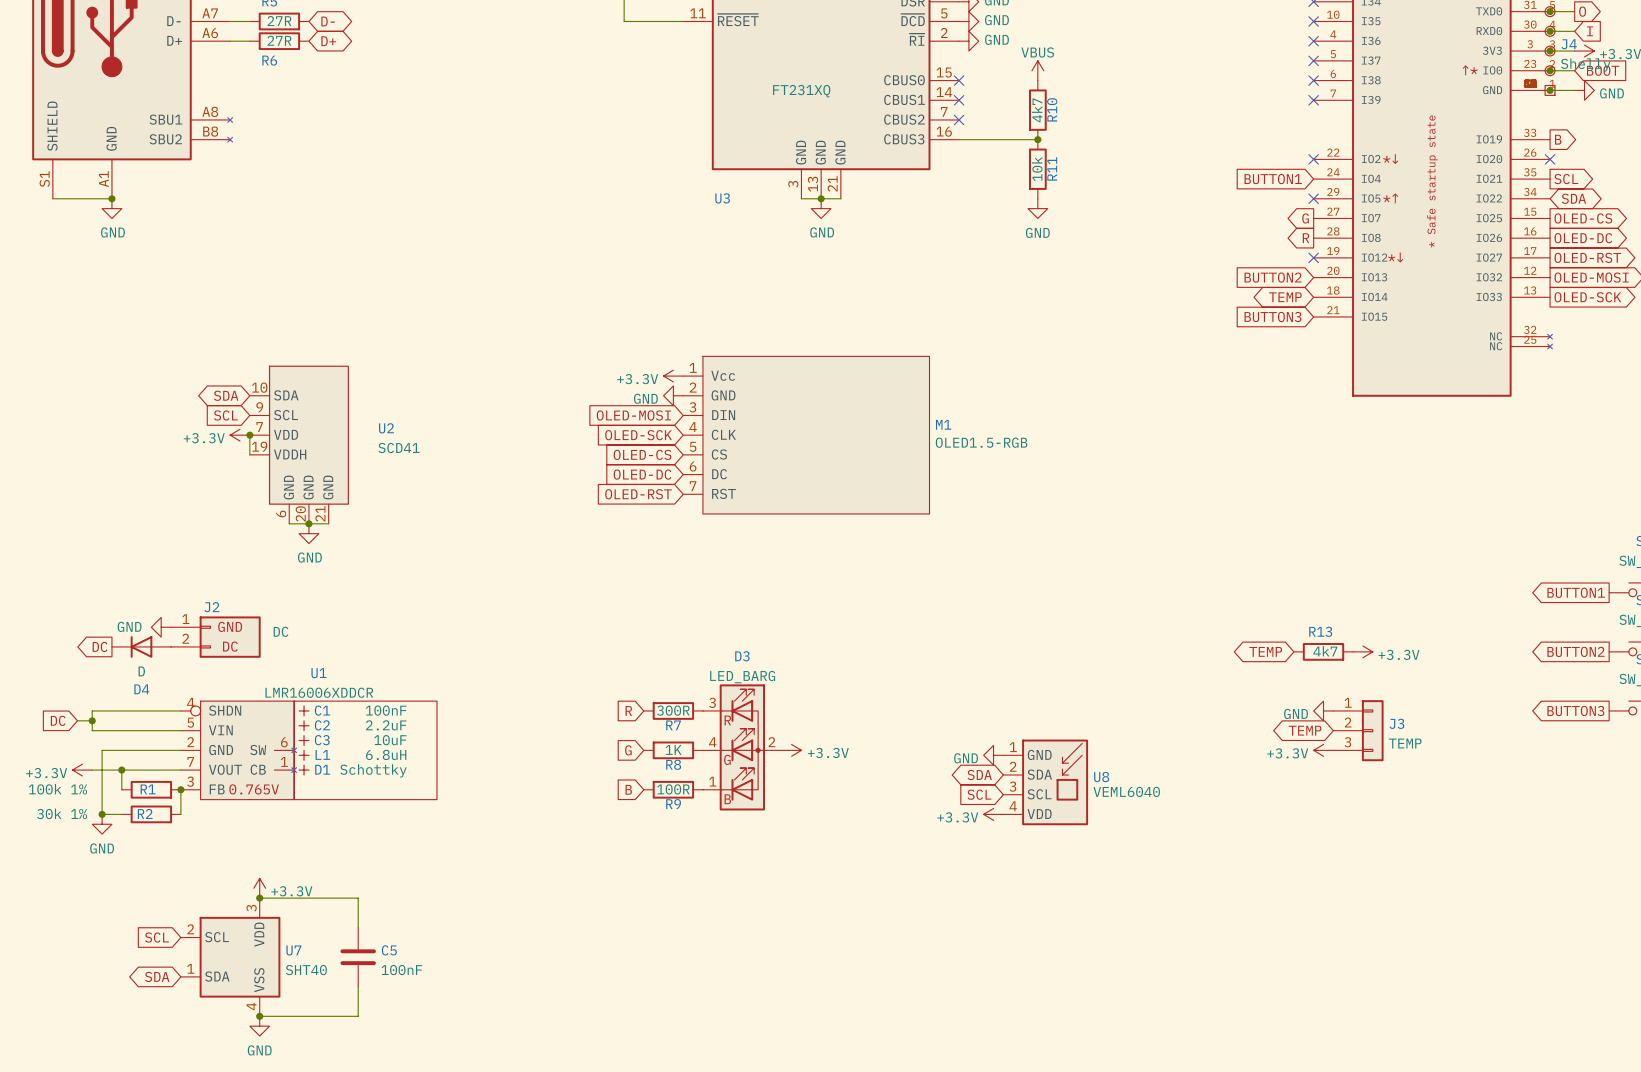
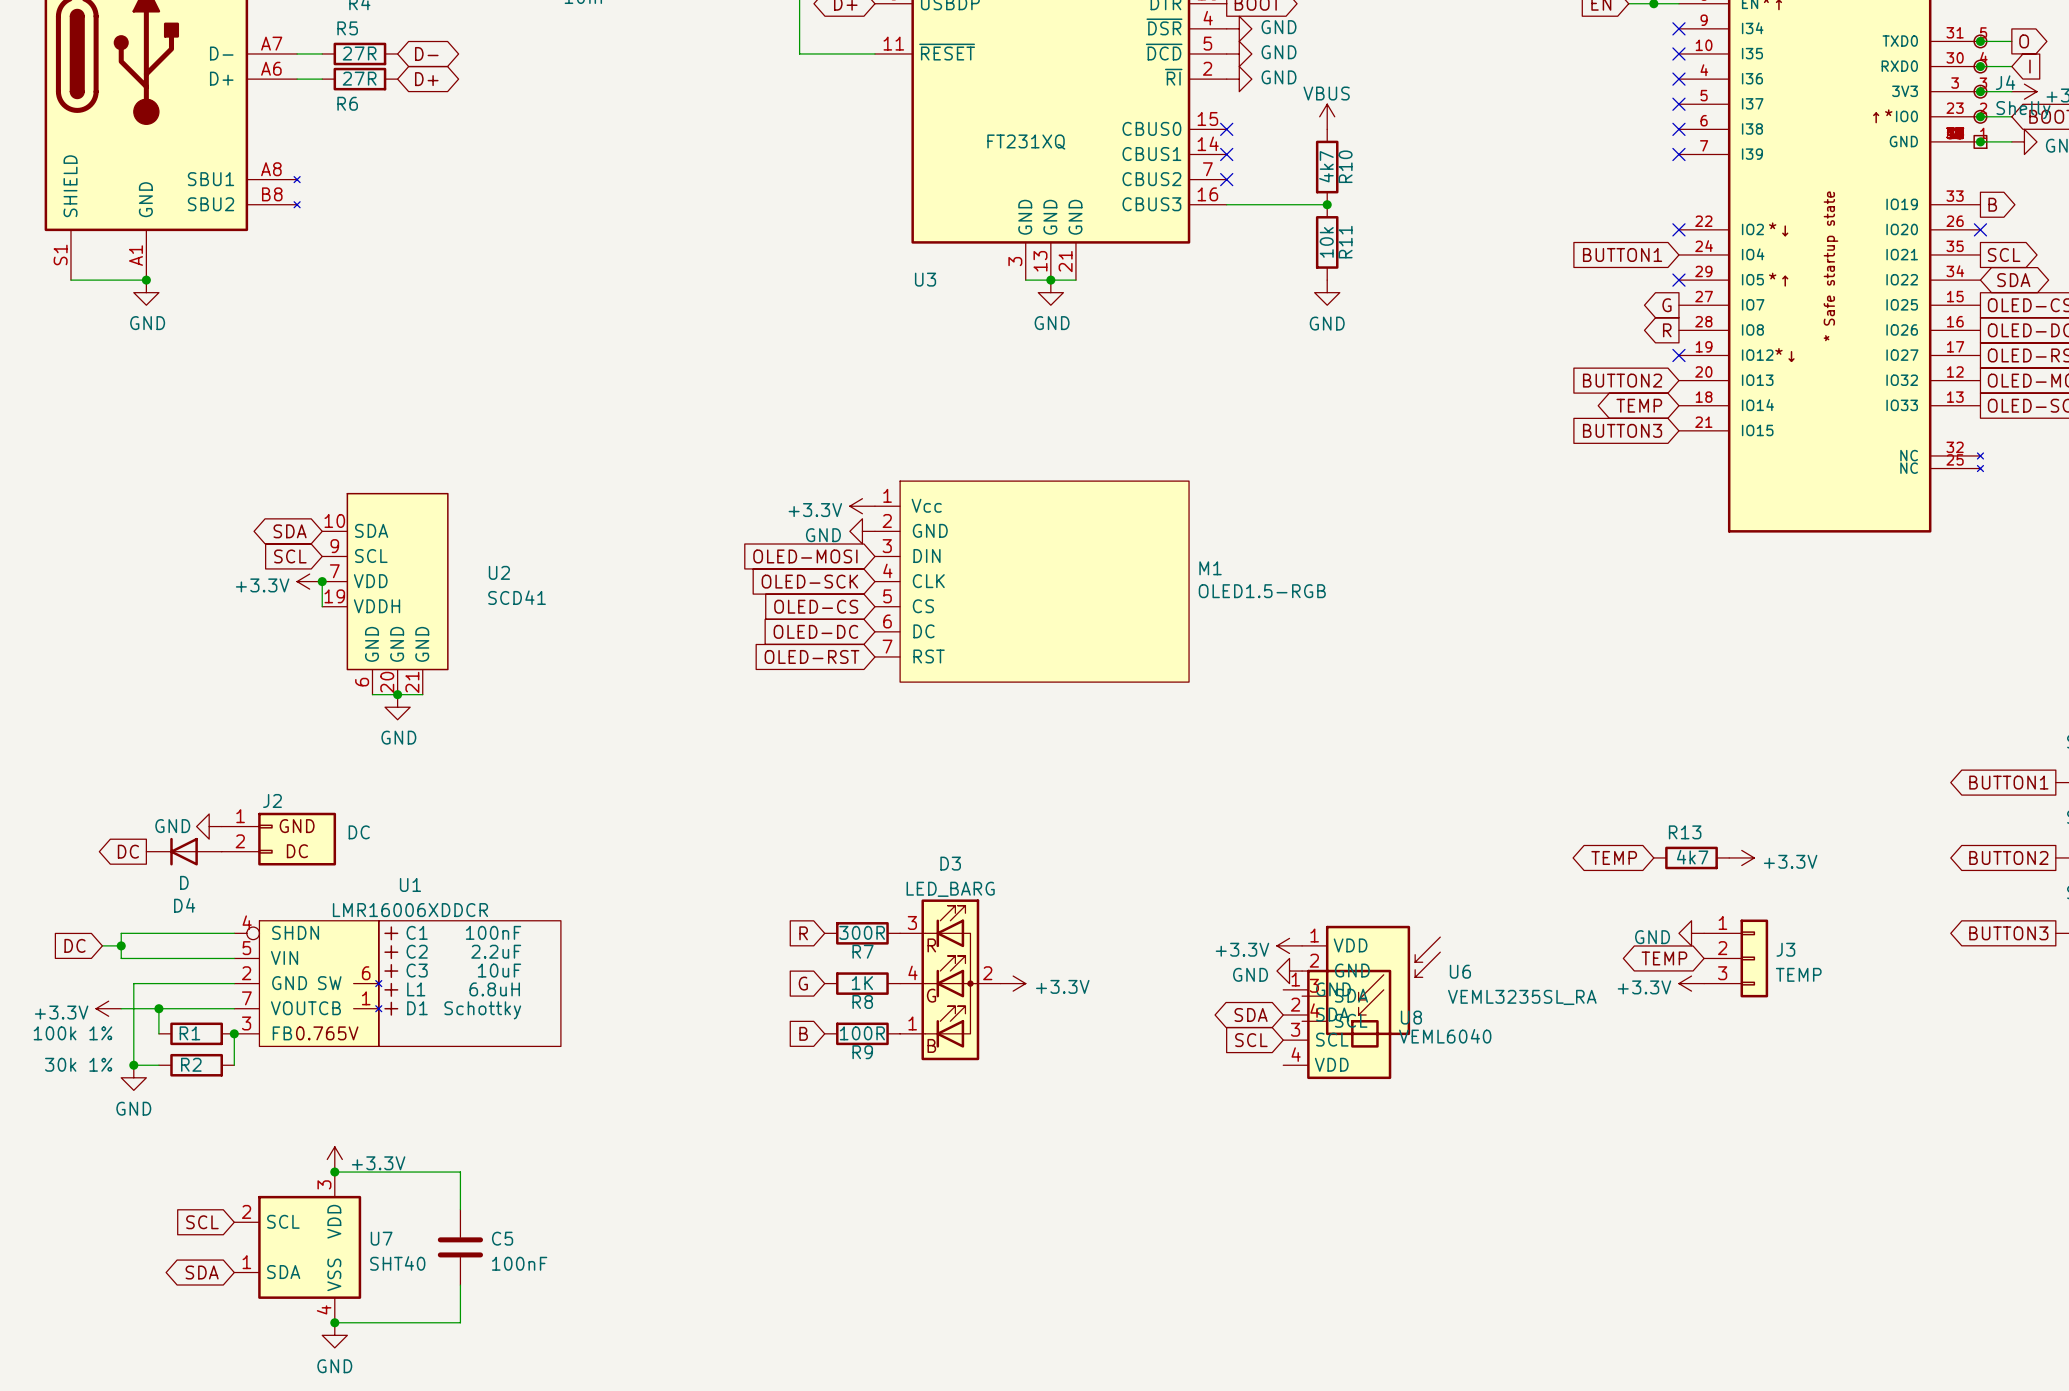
U6: none -> VEML3235SL_RA (1371, 980)
power symbol position: GND (993, 755) -> GND (1289, 971)
power symbol position: +3.3V (993, 814) -> +3.3V (1289, 945)

